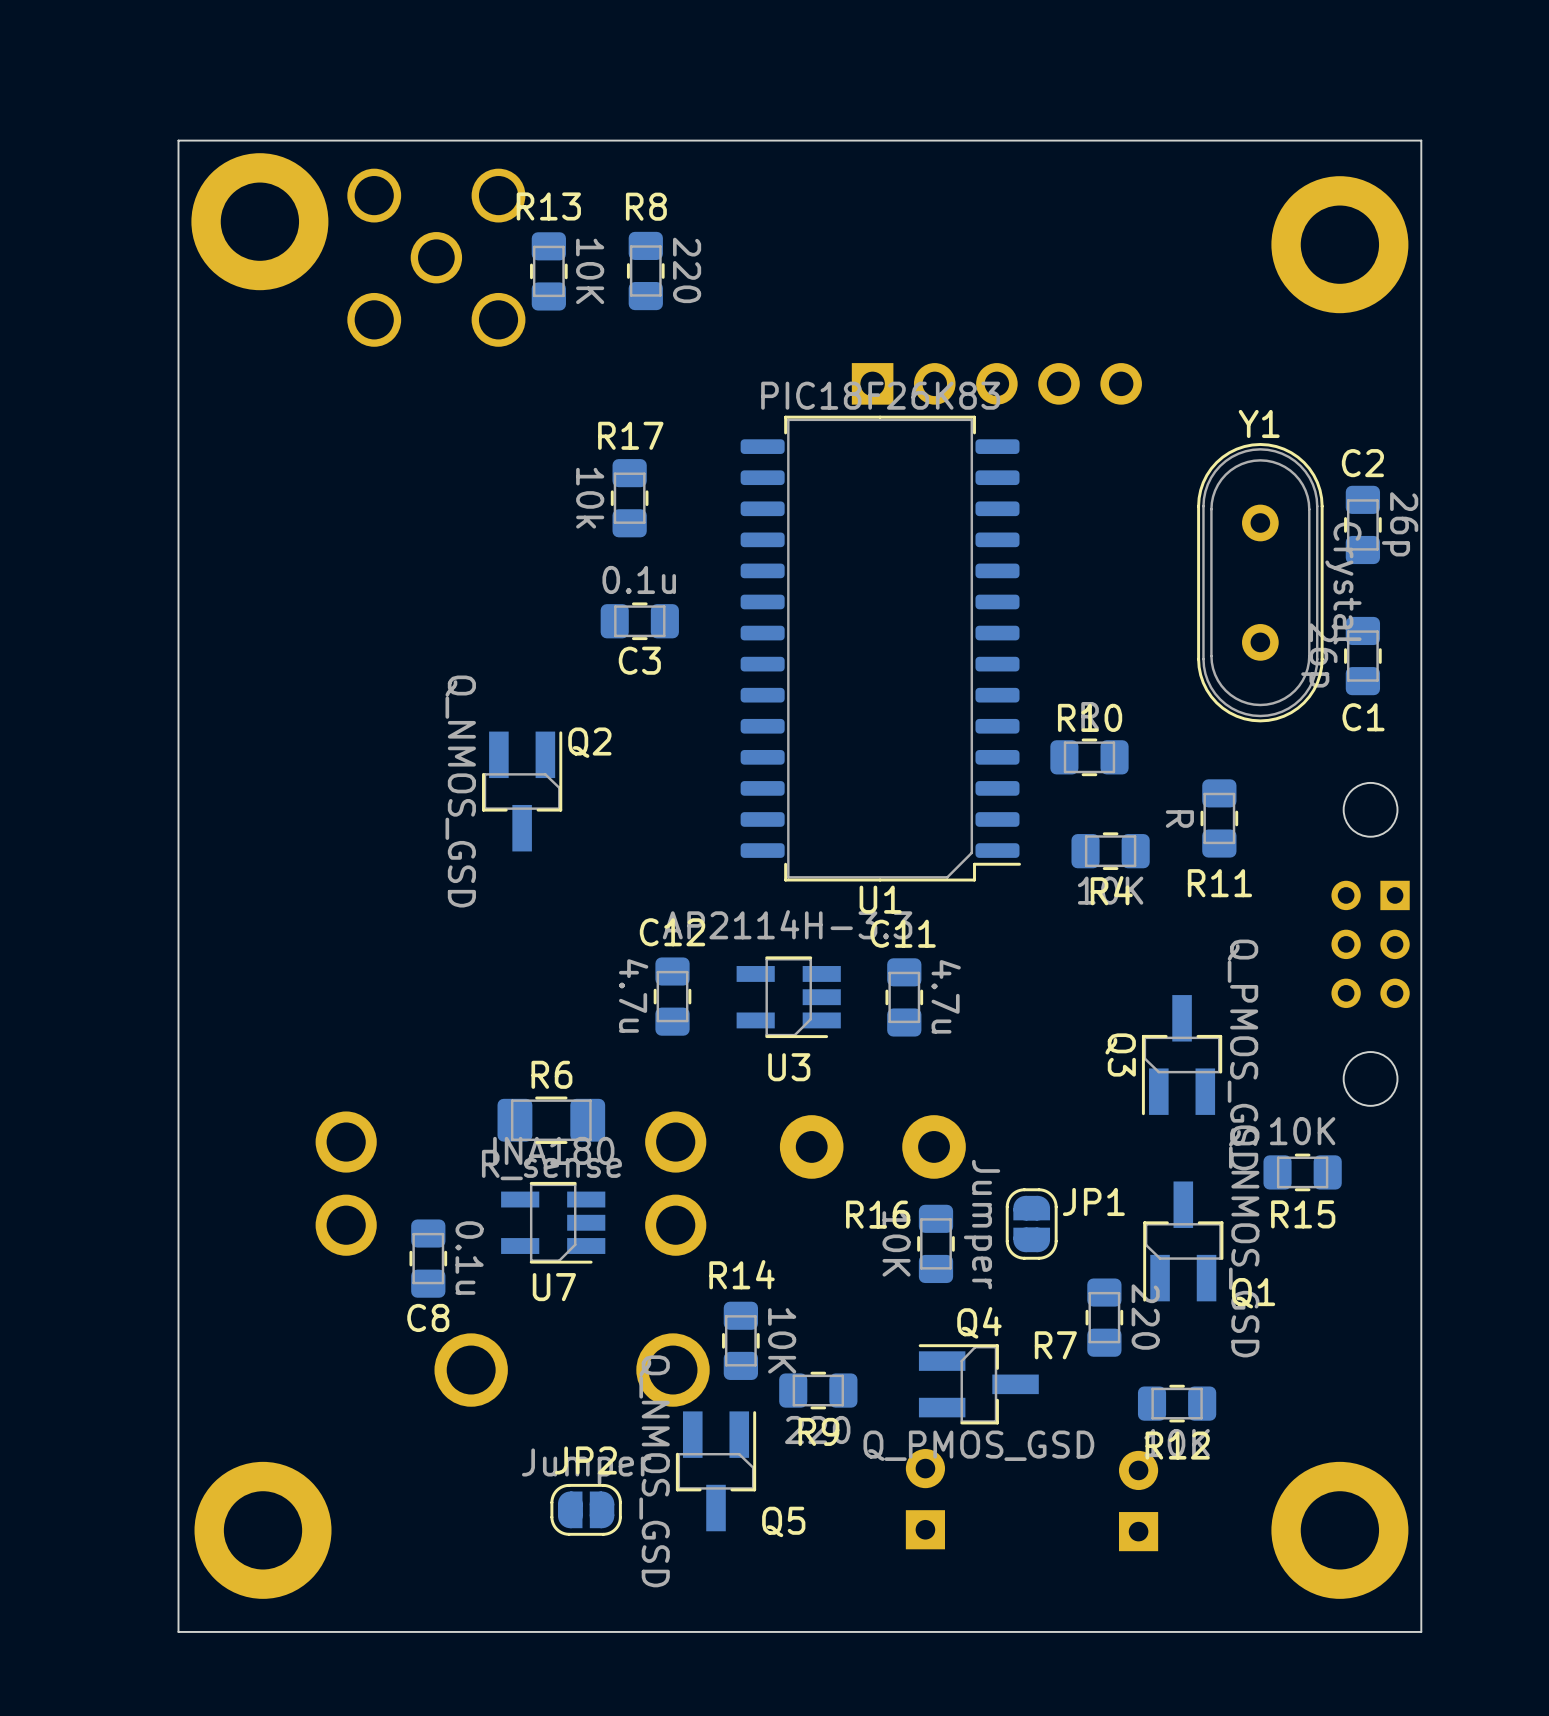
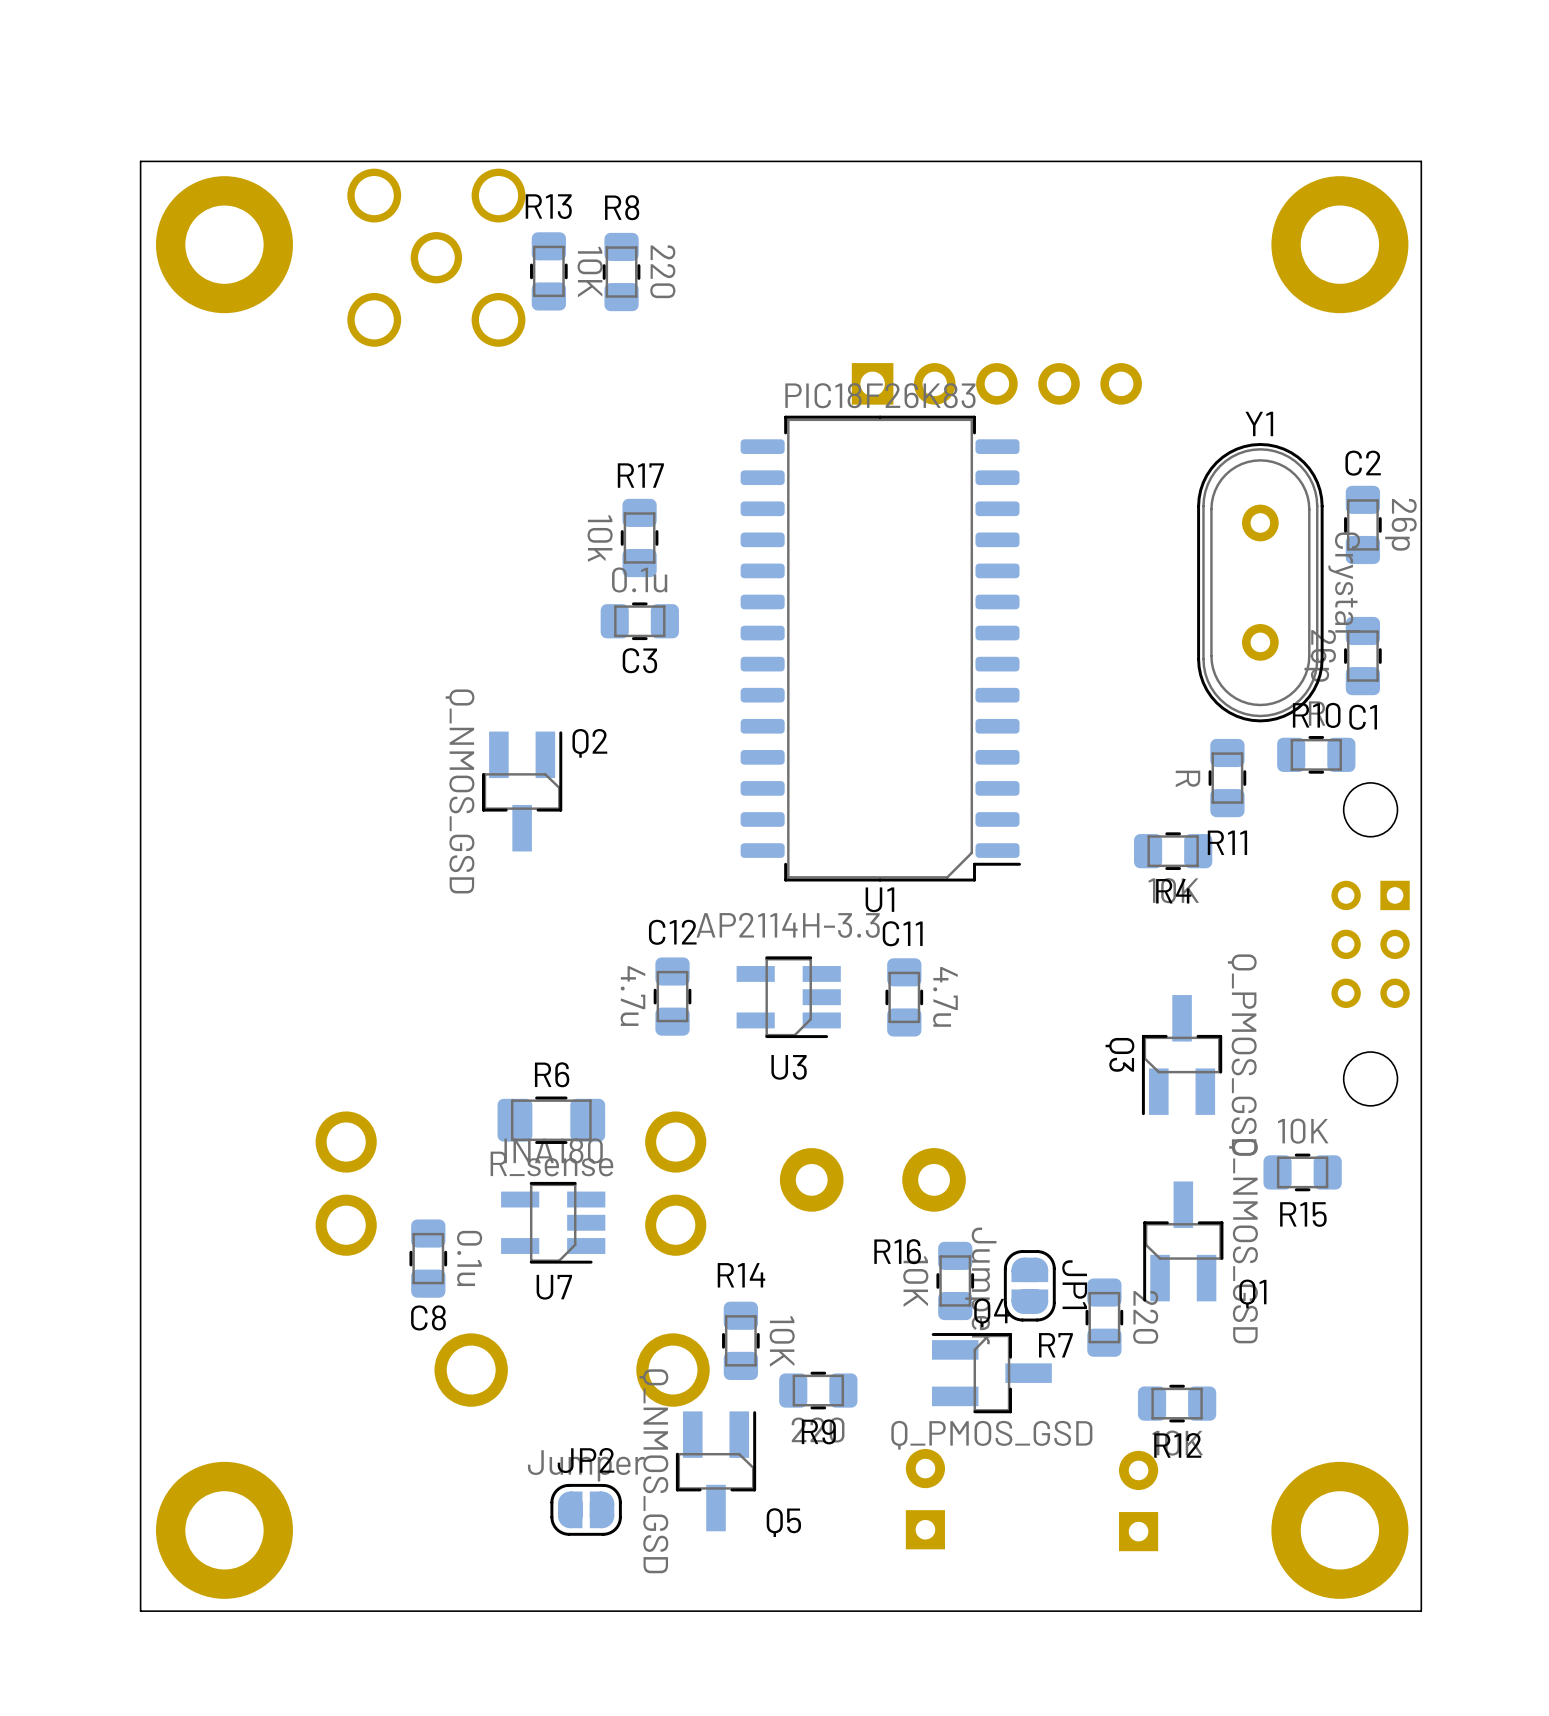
board edge: (1421, 161) (1421, 140) (178, 140) (178, 1631) (1421, 1631) (1421, 1611) -> (1421, 161) (140, 161) (140, 1611) (1421, 1611)
part position: (259, 221) -> (224, 244)
R8 position: (645, 270) -> (621, 272)
R17 position: (629, 498) -> (639, 537)
R10 position: (1089, 757) -> (1316, 754)
R11 position: (1219, 818) -> (1227, 778)
R4 position: (1110, 851) -> (1173, 851)
part position: (872, 1146) -> (872, 1179)
JP1 name rotation: 0° (1093, 1201) -> 90° clockwise (1074, 1284)
JP1 position: (1031, 1224) -> (1029, 1285)
R16 position: (935, 1243) -> (955, 1280)
Q4 position: (978, 1384) -> (991, 1373)
part position: (263, 1530) -> (224, 1530)

